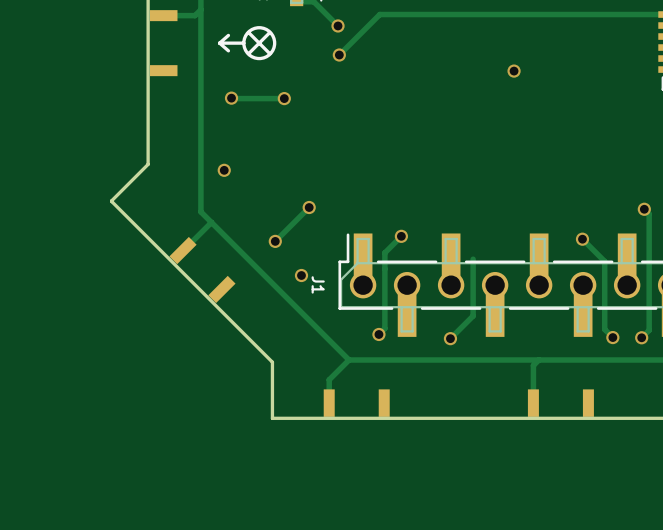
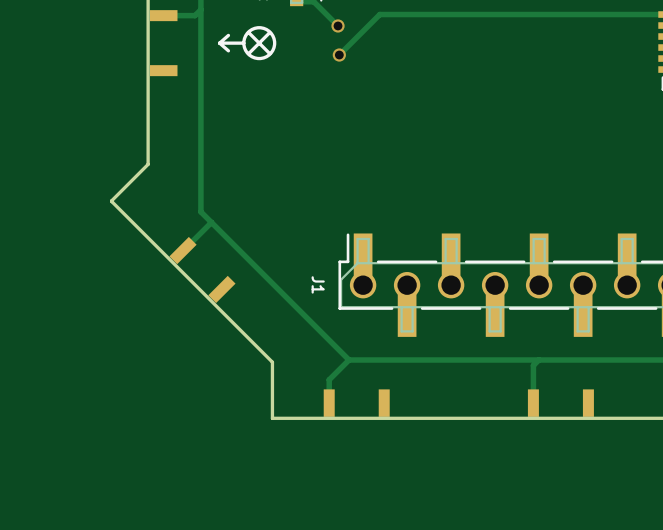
via: (514, 71) -> none
track: (231, 98) (284, 98) -> none
via: (231, 98) -> none
via: (284, 98) -> none
via: (224, 170) -> none
track: (309, 207) (275, 241) -> none
via: (309, 207) -> none
track: (644, 209) (649, 214) (649, 330) (641, 337) -> none
via: (644, 209) -> none
track: (401, 236) (384, 252) (384, 328) (378, 334) -> none
via: (401, 236) -> none
track: (582, 239) (604, 261) (604, 329) (612, 337) -> none
via: (582, 239) -> none
via: (275, 241) -> none
track: (473, 259) (473, 315) (450, 338) -> none
via: (301, 275) -> none
via: (378, 334) -> none
via: (612, 337) -> none
via: (641, 337) -> none
via: (450, 338) -> none

